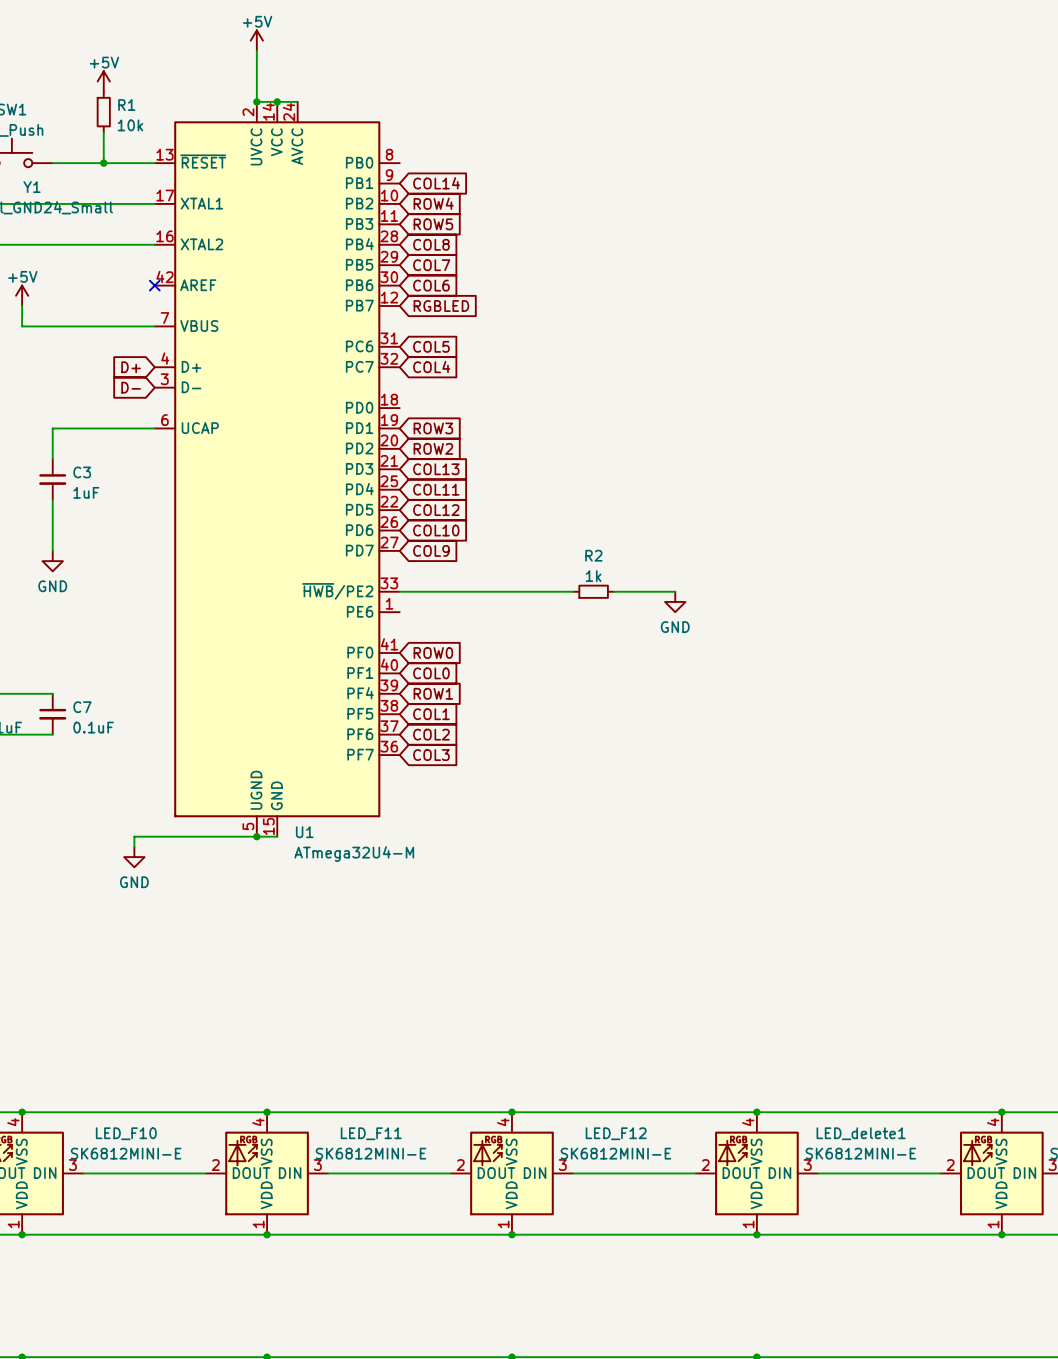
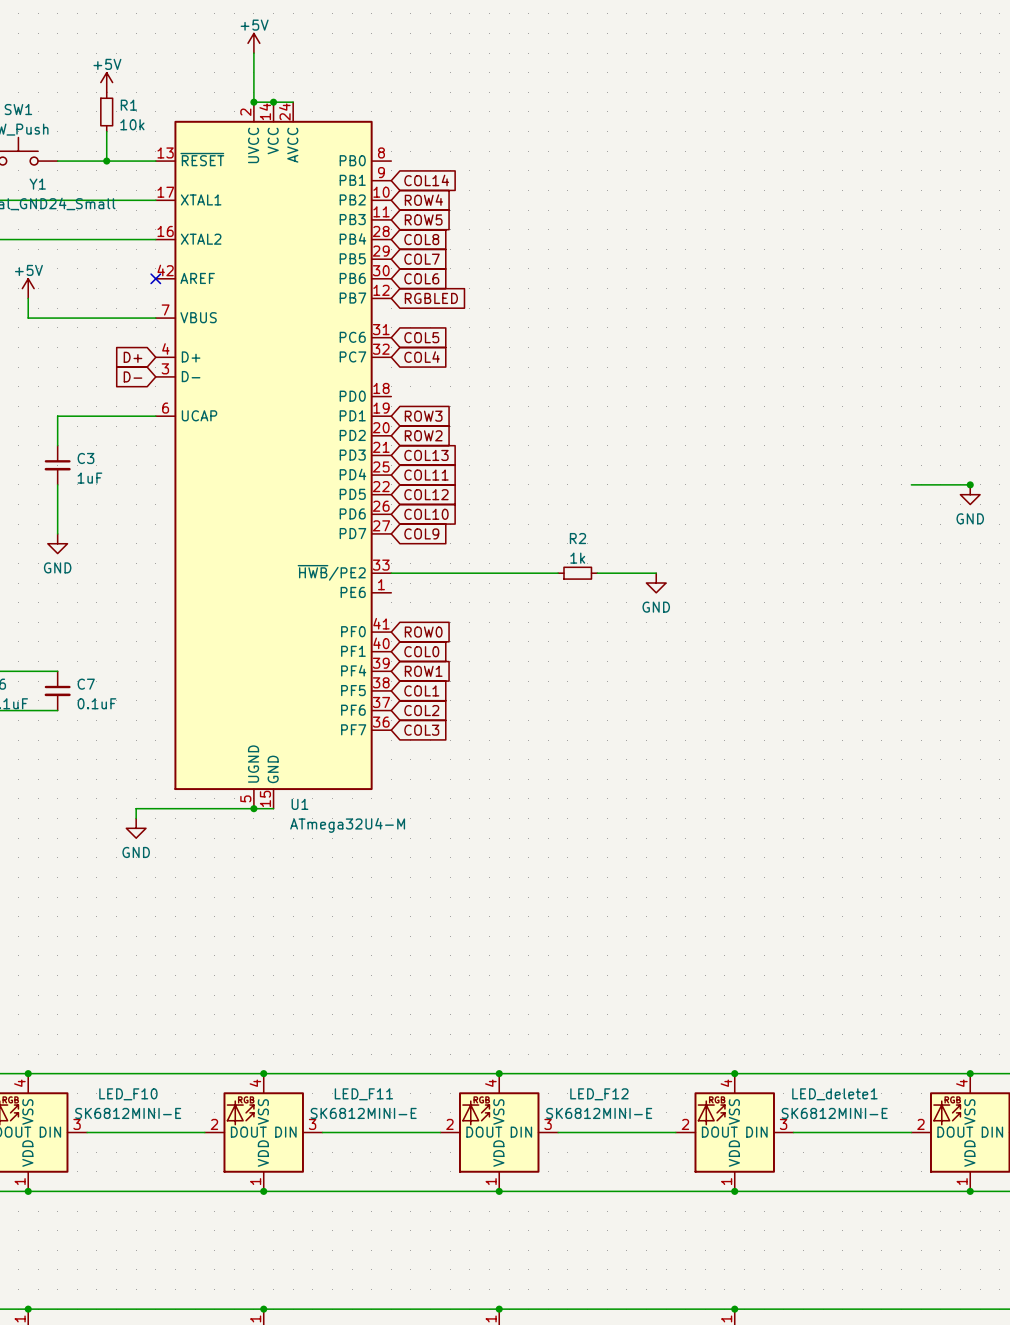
wire: none -> (911, 484) (970, 484)
junction: none -> (970, 484)
power symbol: none -> GND (970, 494)

